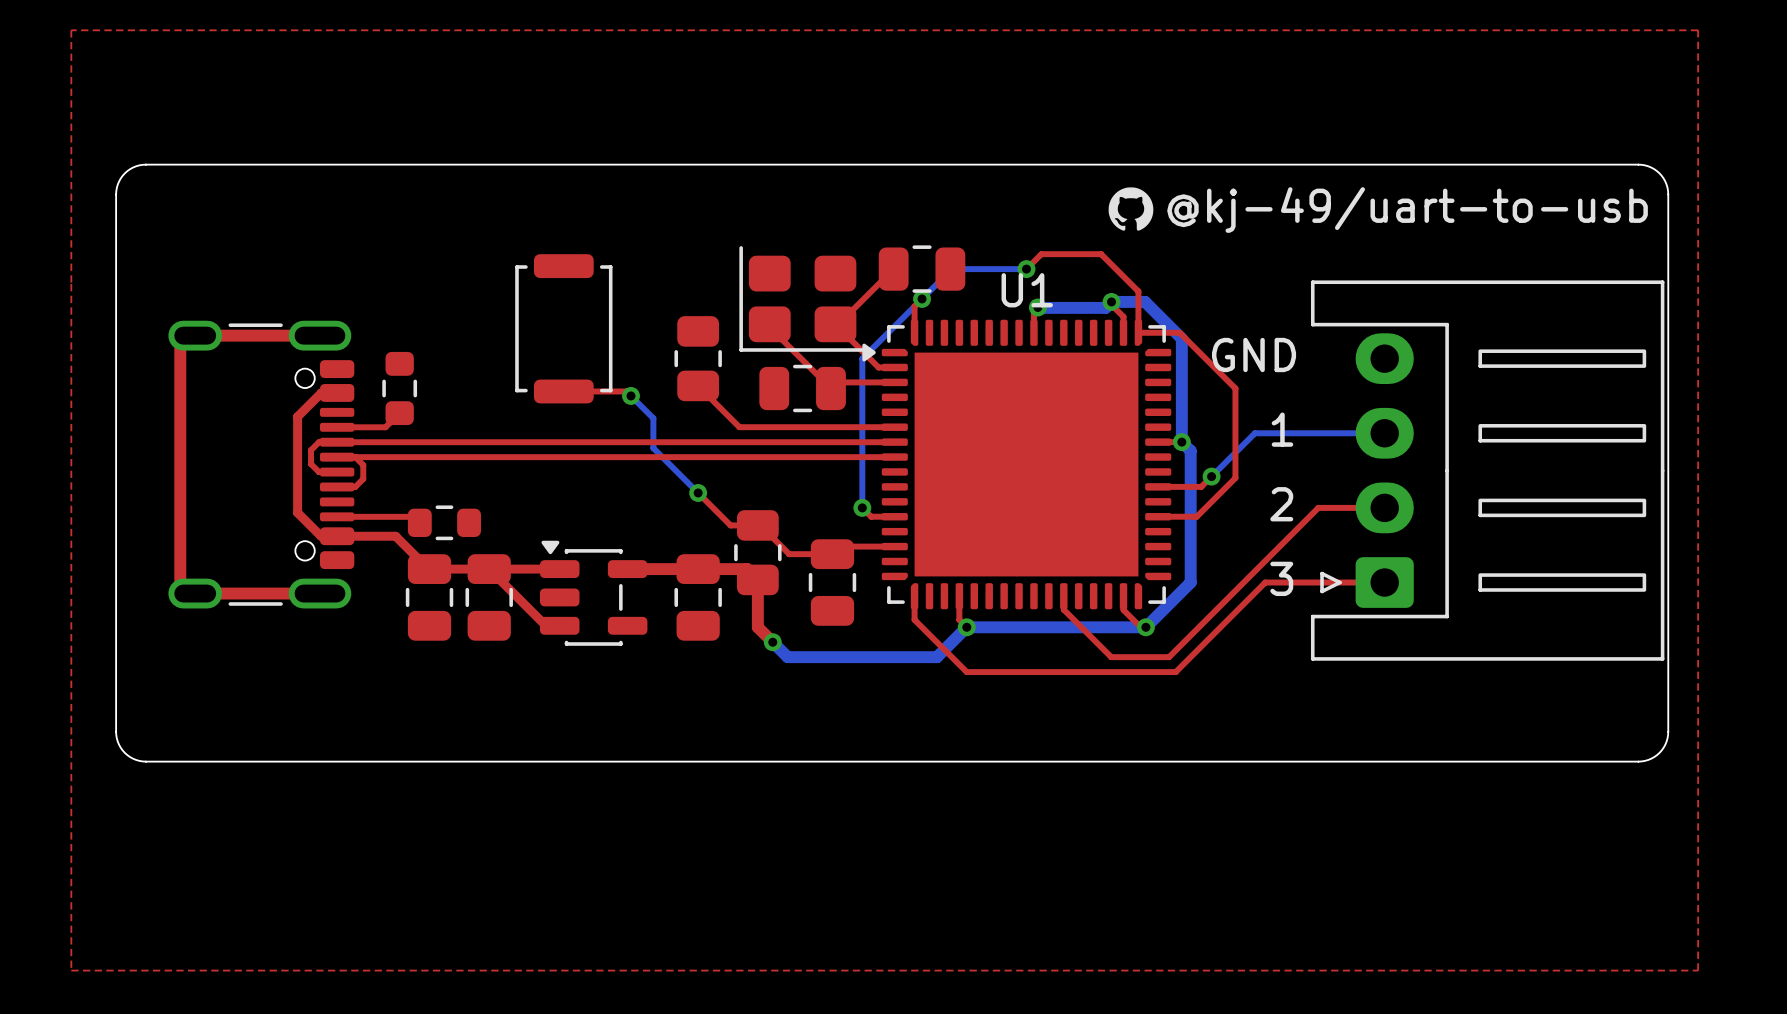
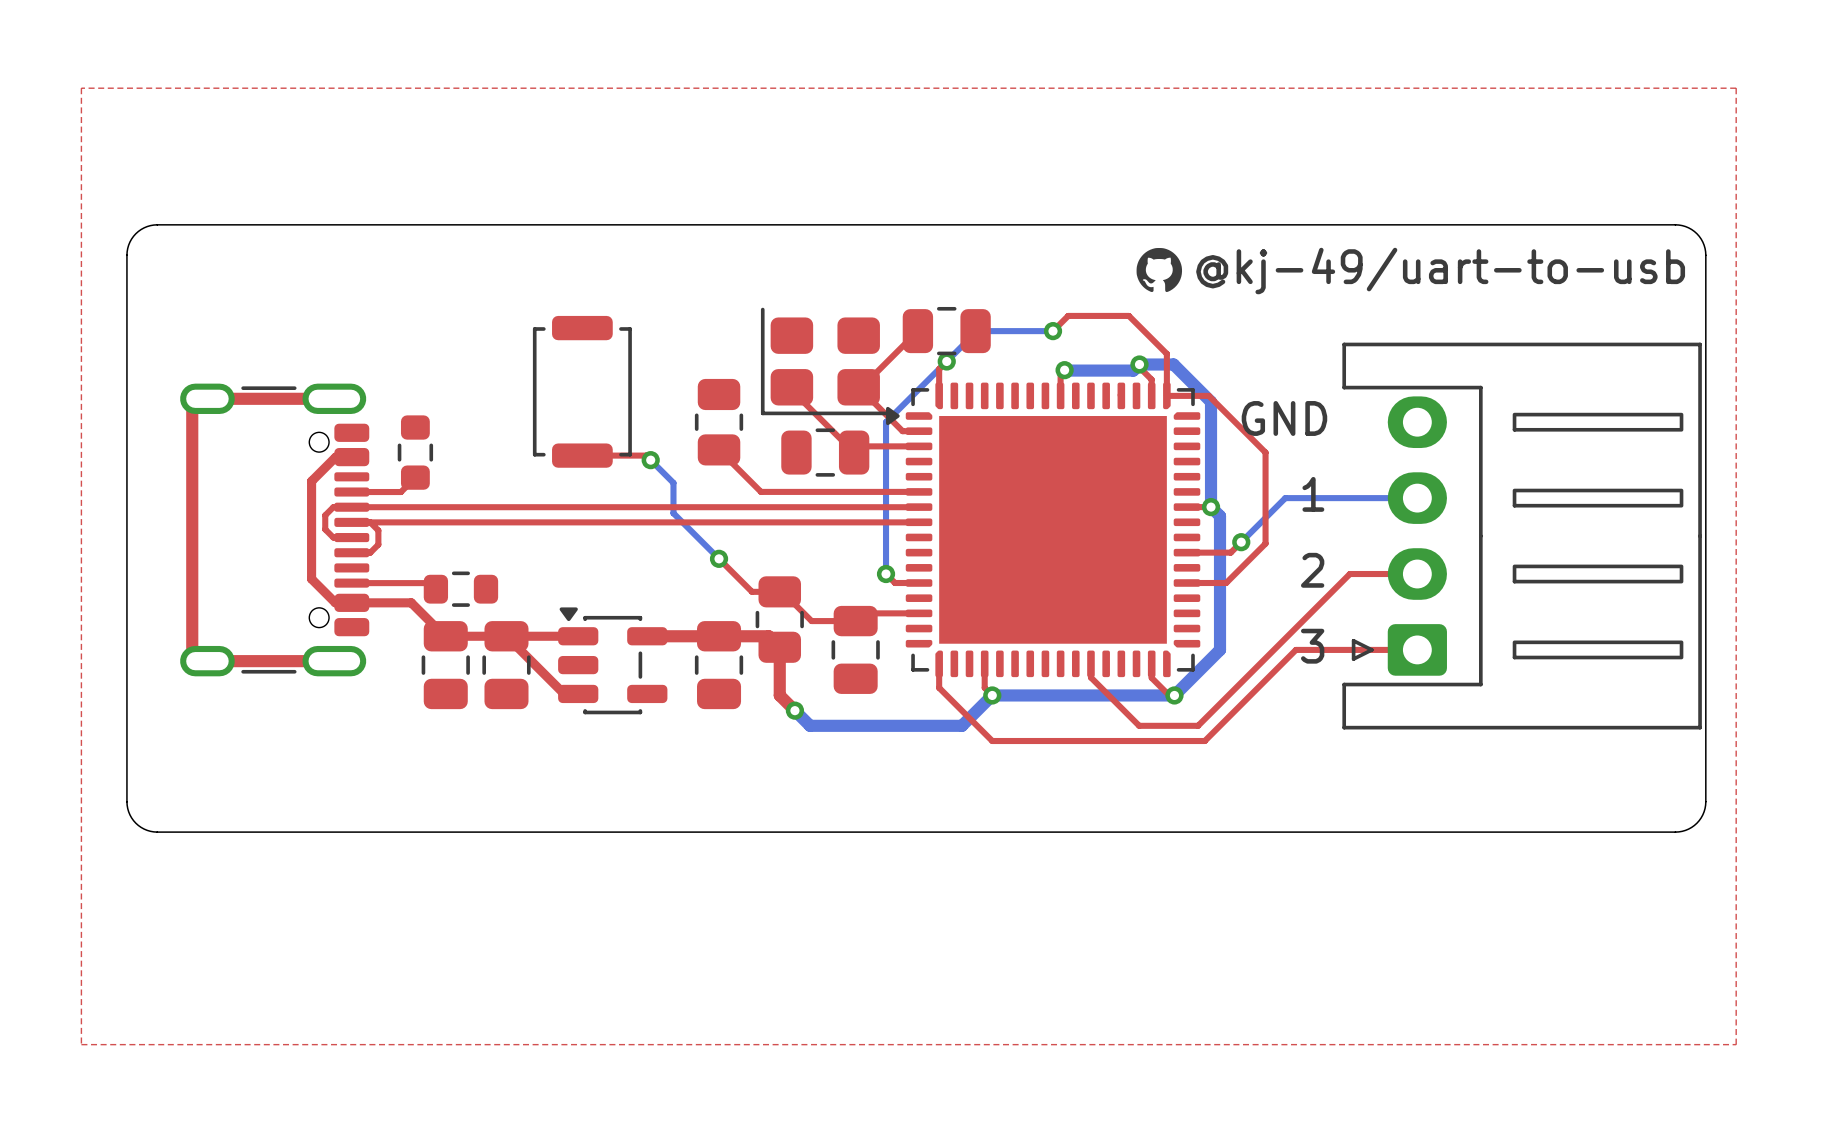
U1 name: U1 (1027, 290) -> none

